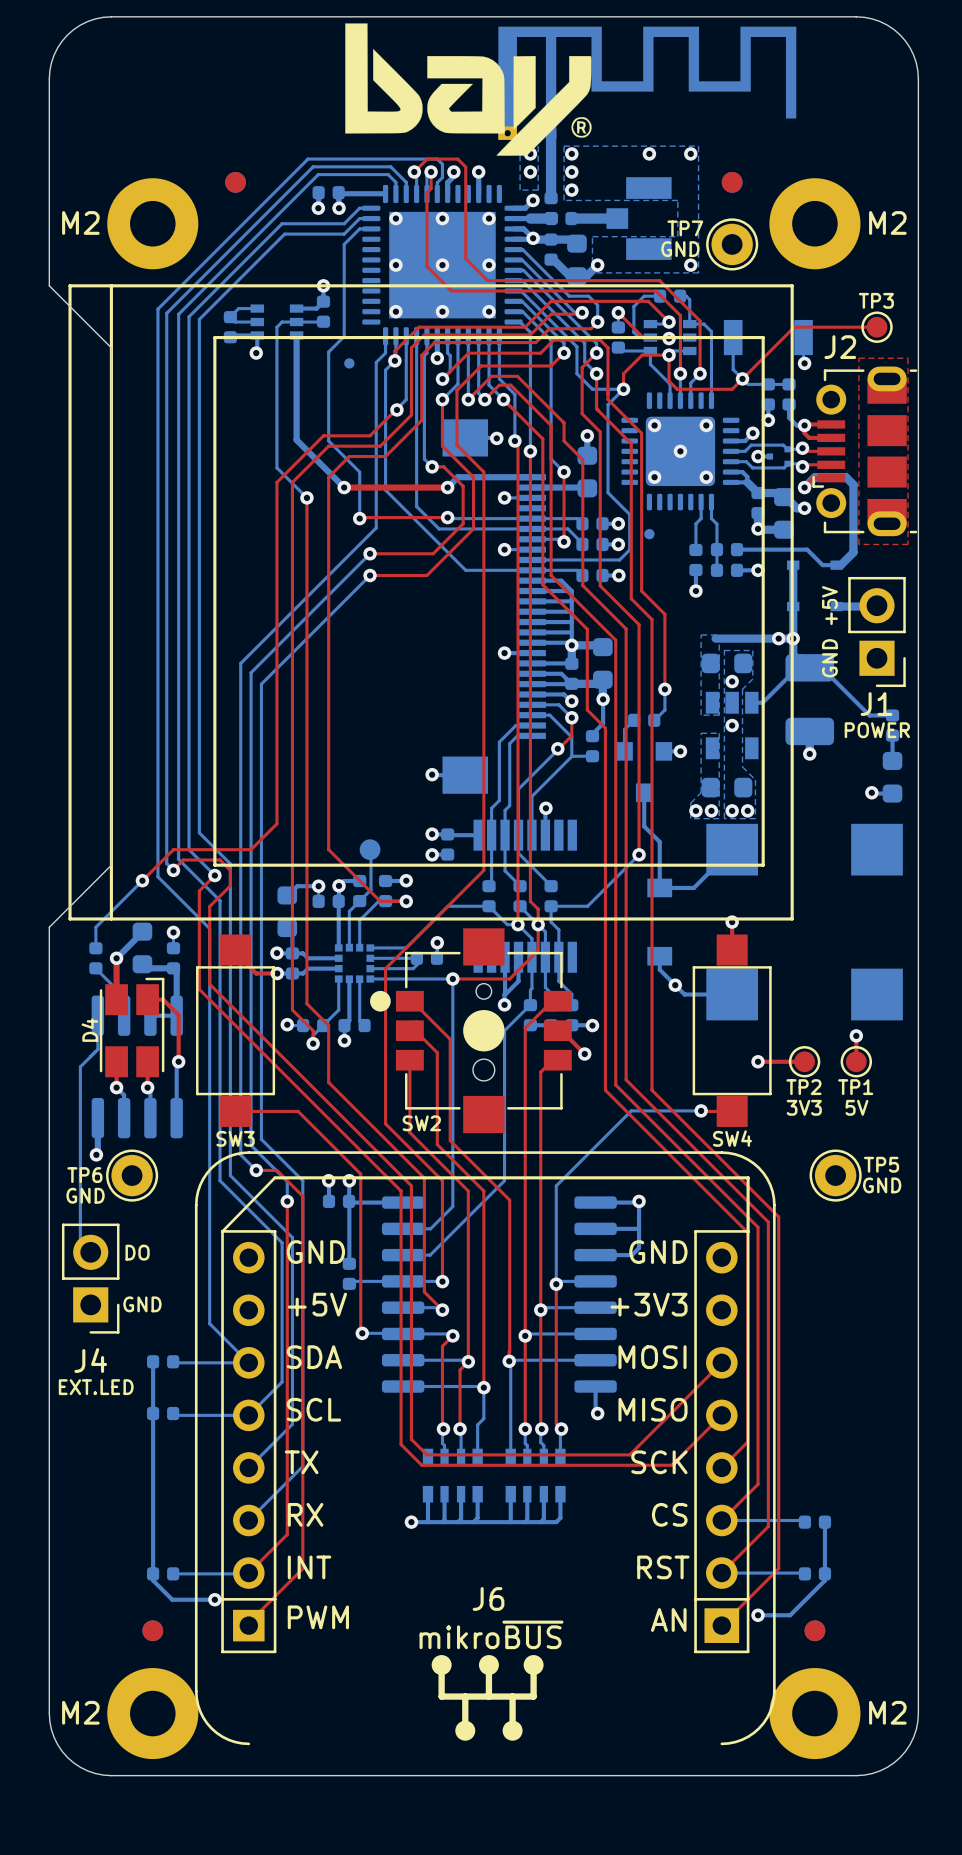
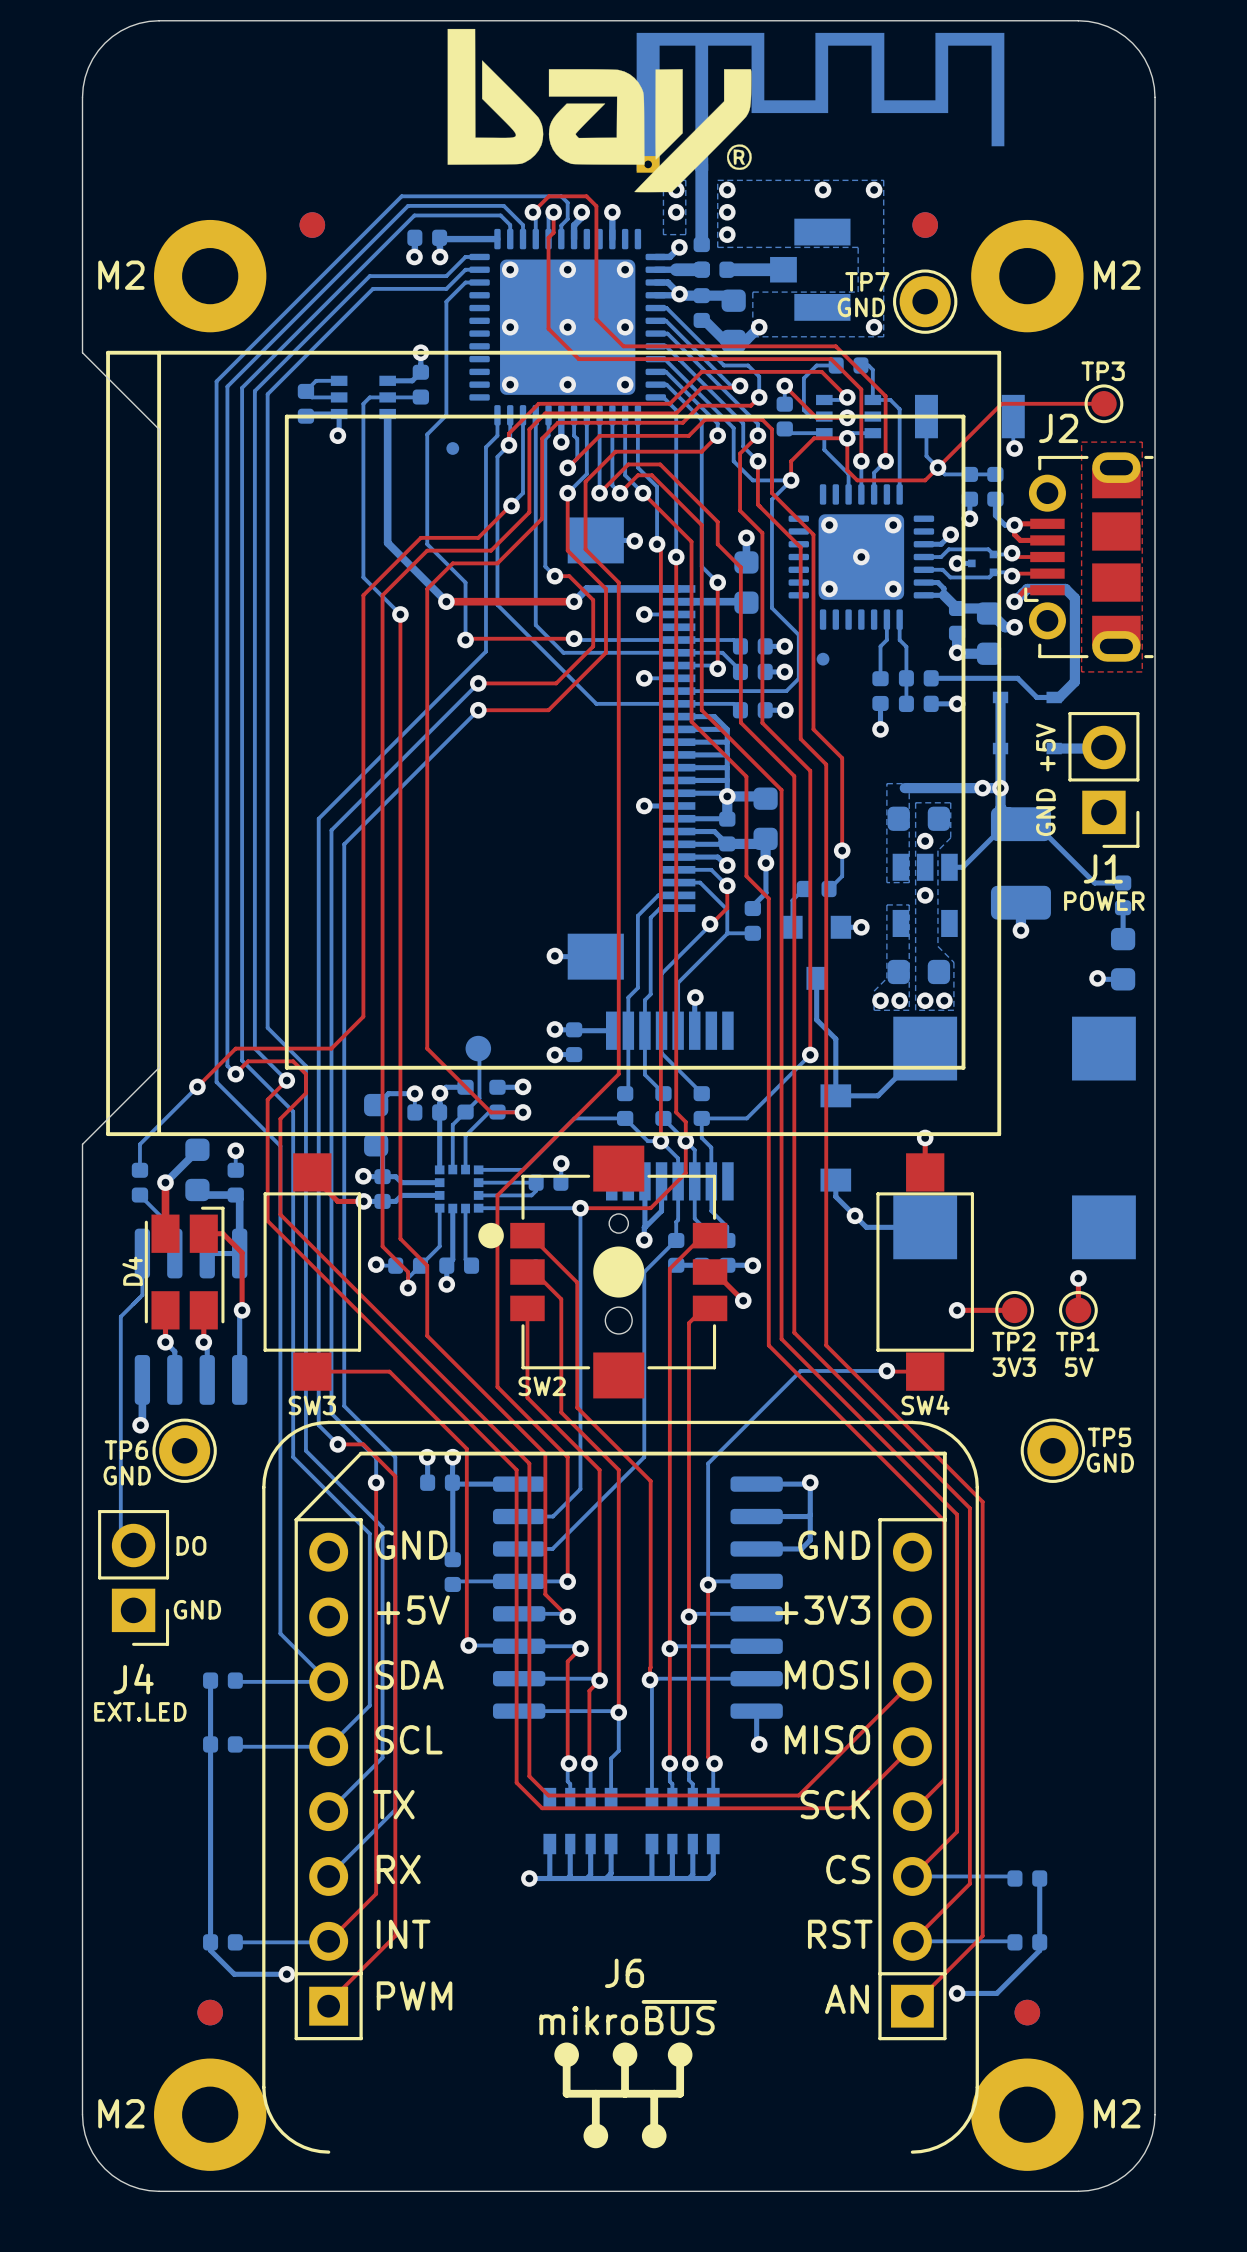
part footprint: [362, 184, 523, 346] -> [469, 228, 667, 426]

